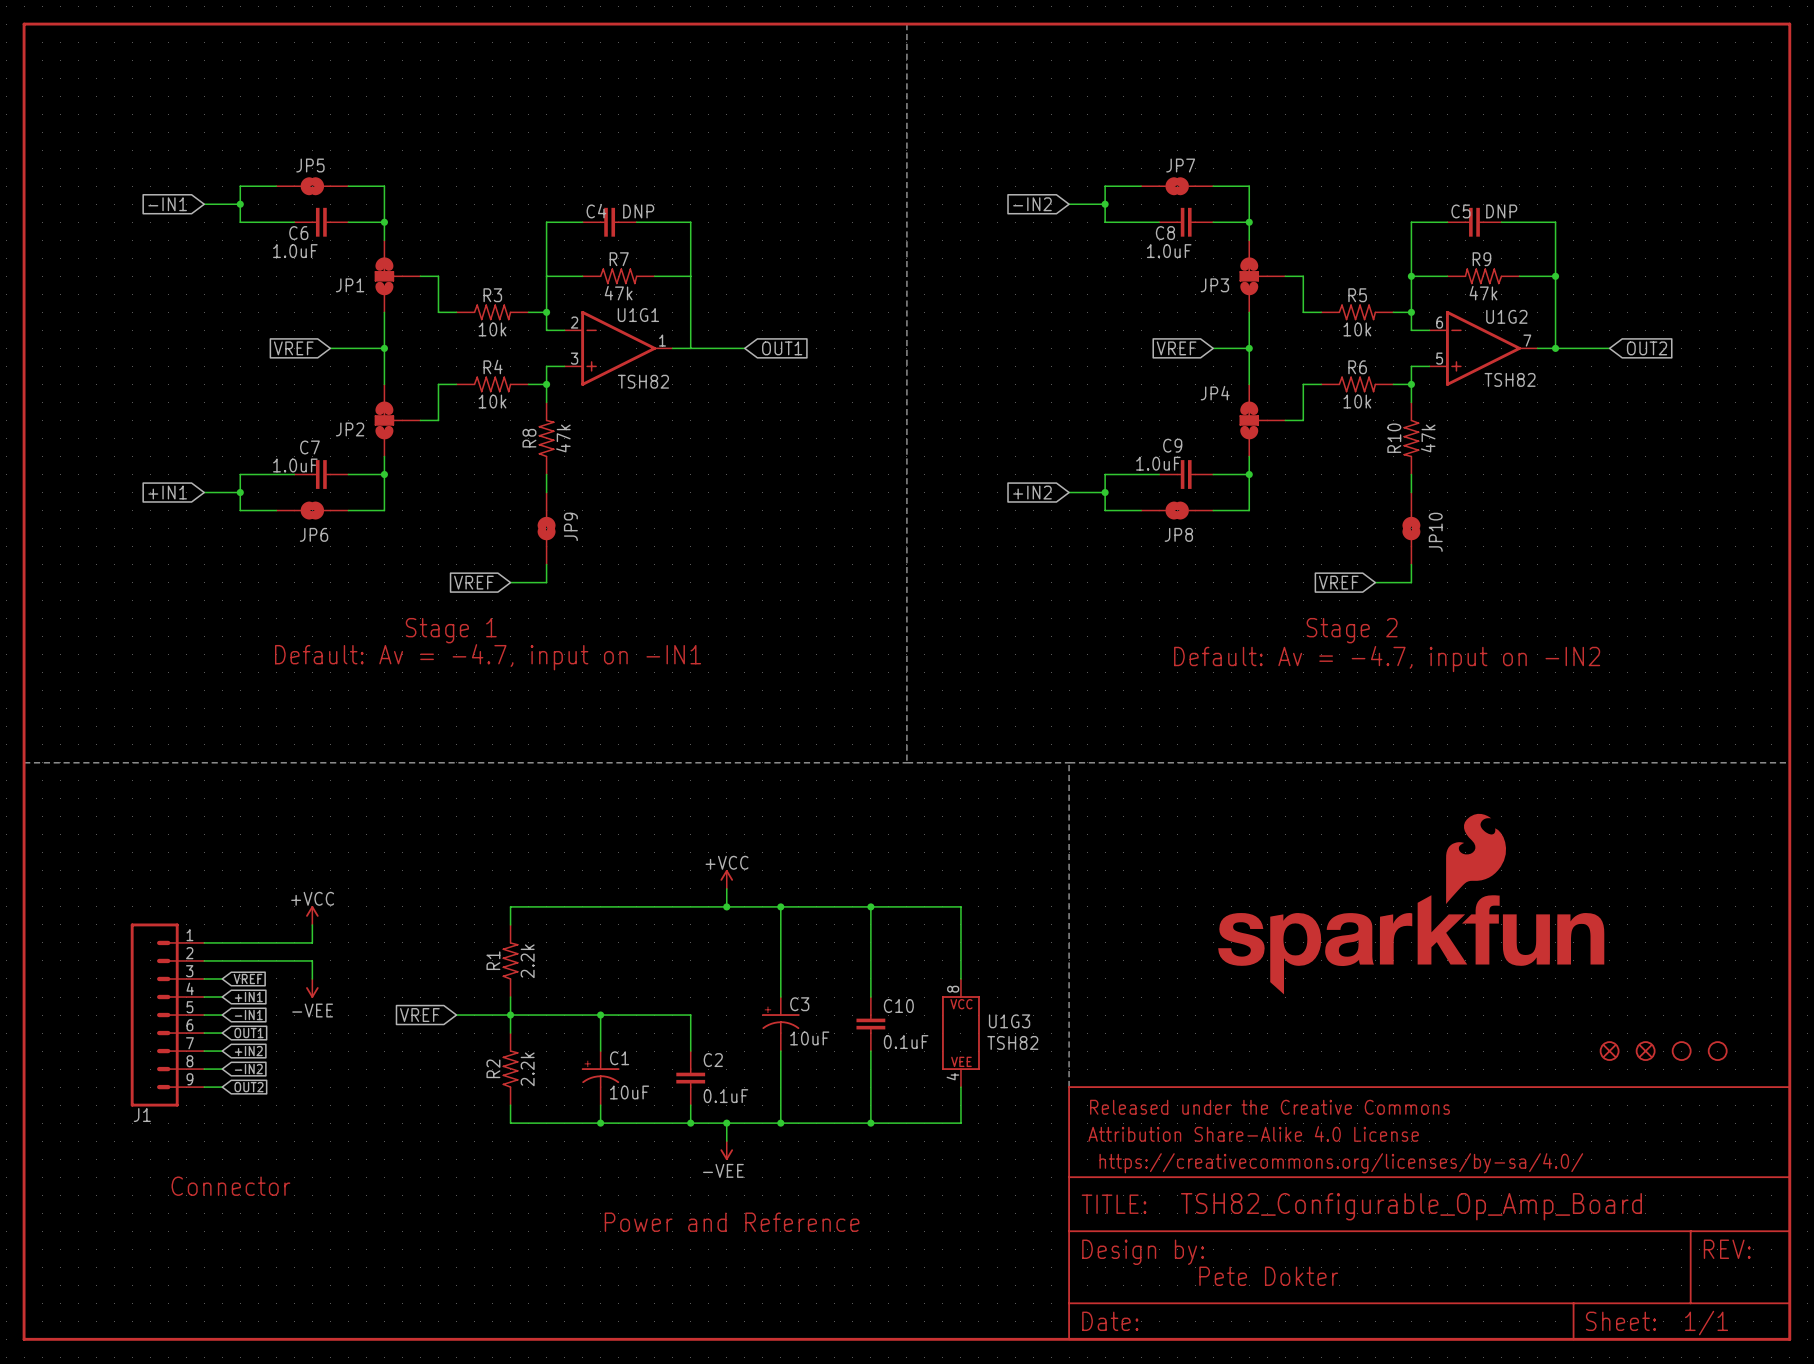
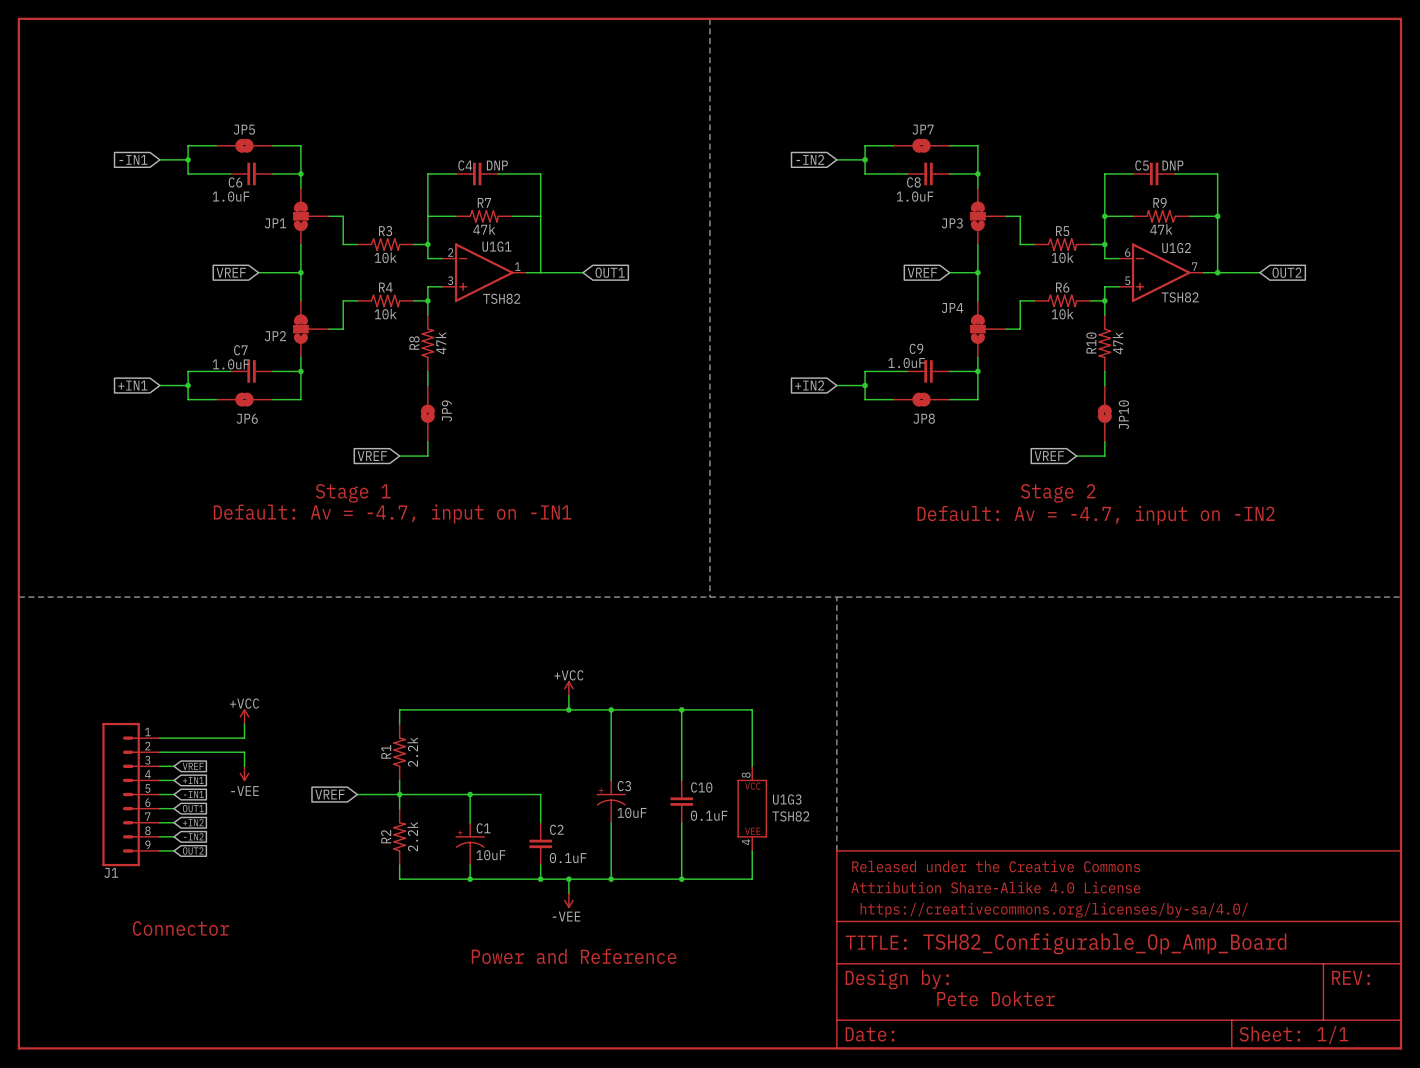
part: (1411, 904) -> none
part: (1609, 1051) -> none
part: (1645, 1051) -> none
part: (1681, 1051) -> none
part: (1717, 1051) -> none

